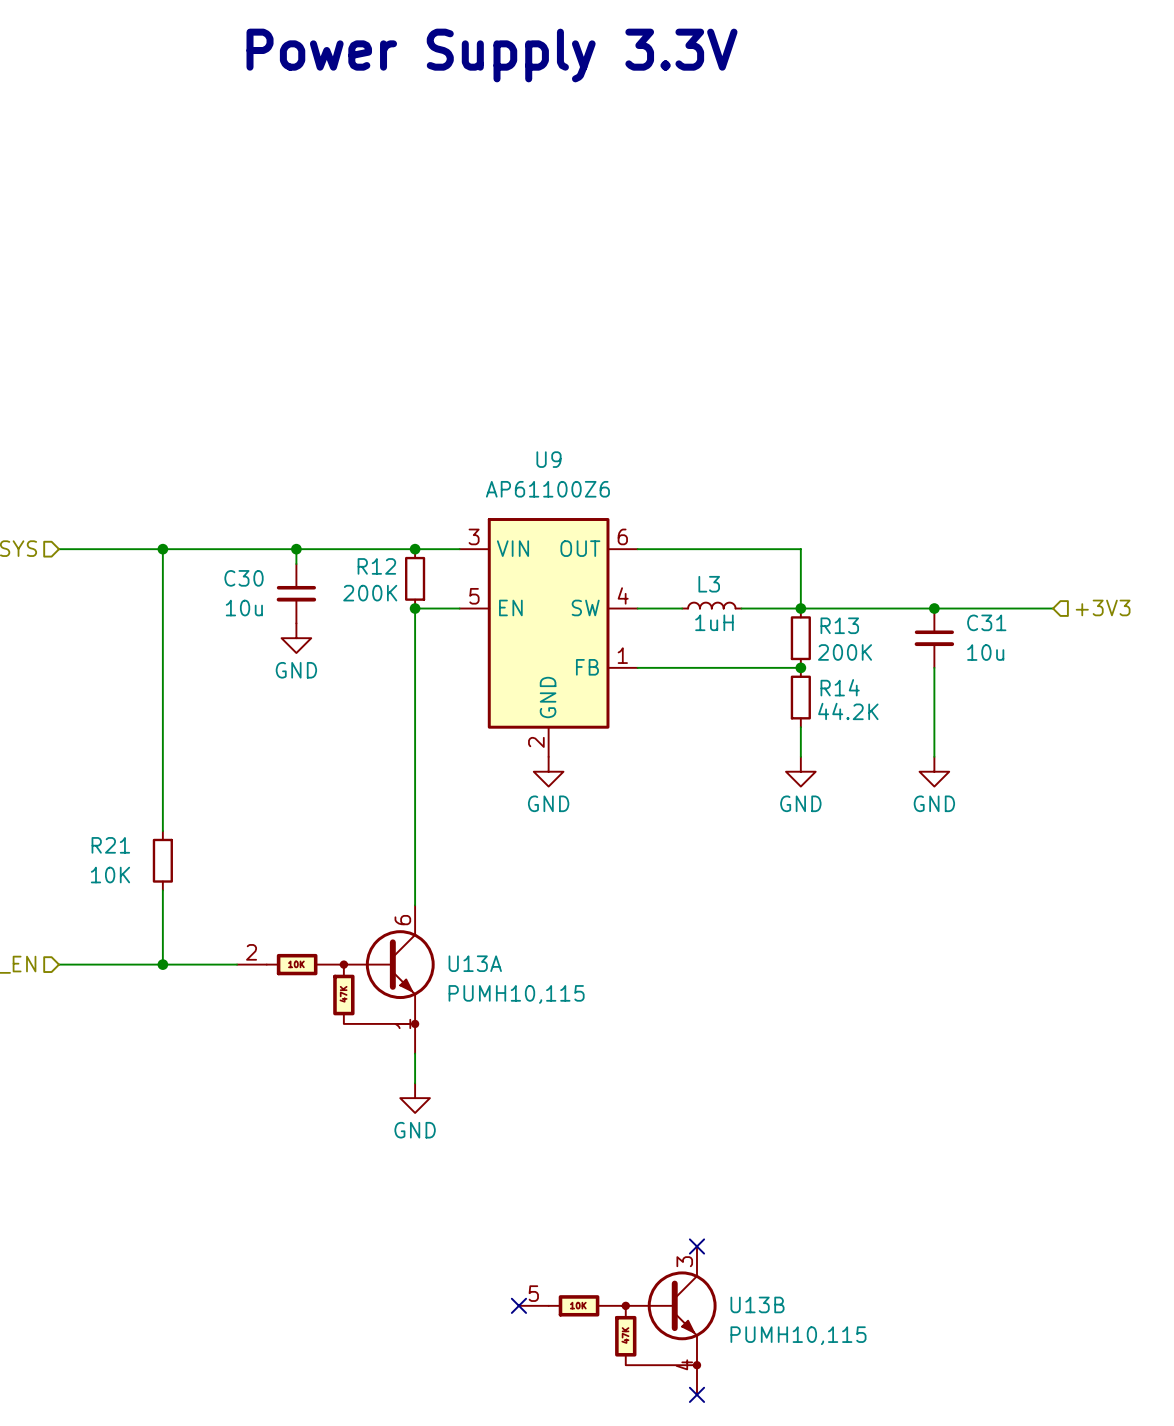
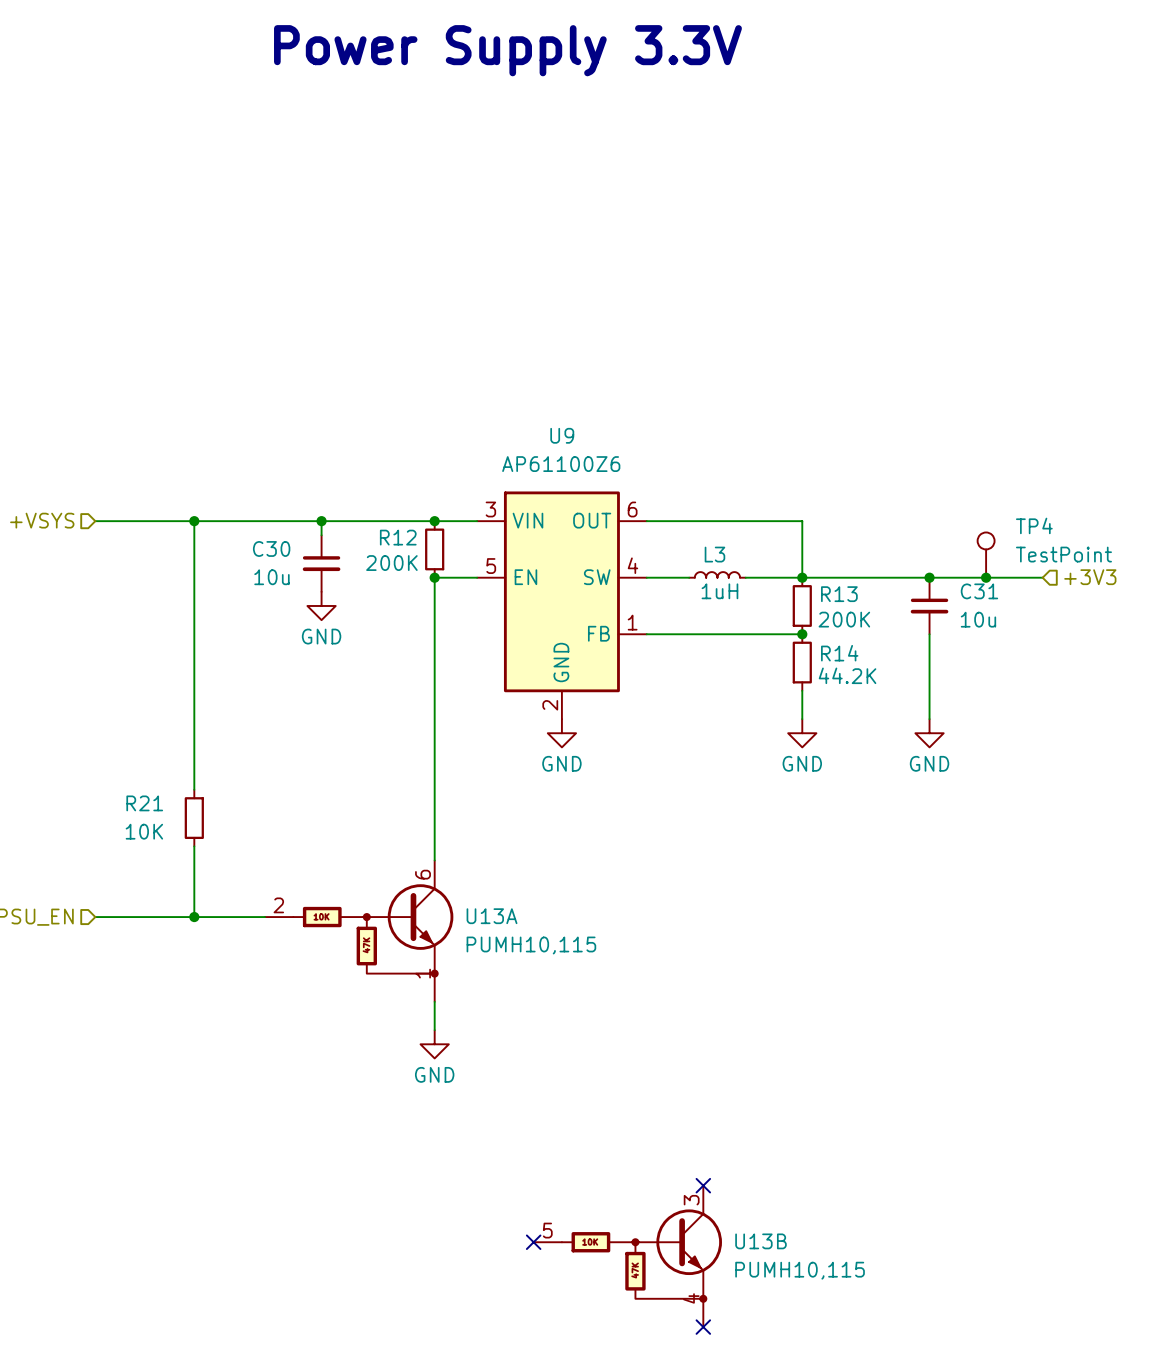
TP4: none -> TestPoint (986, 555)
junction: none -> (986, 577)

